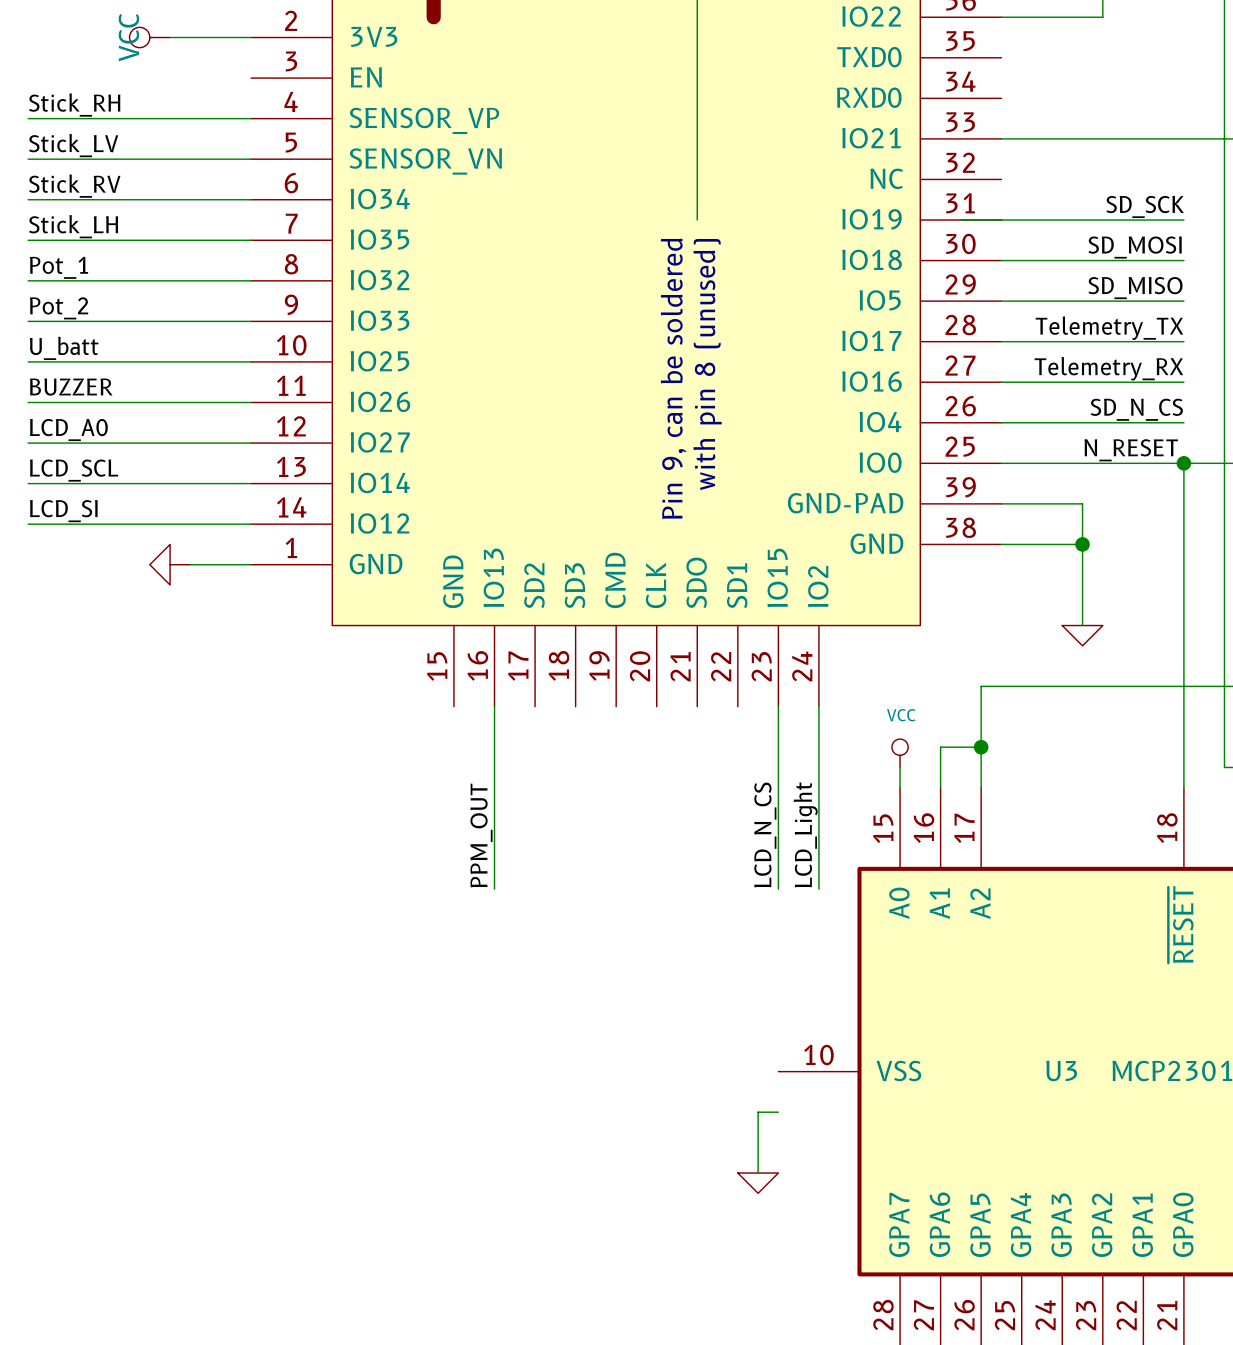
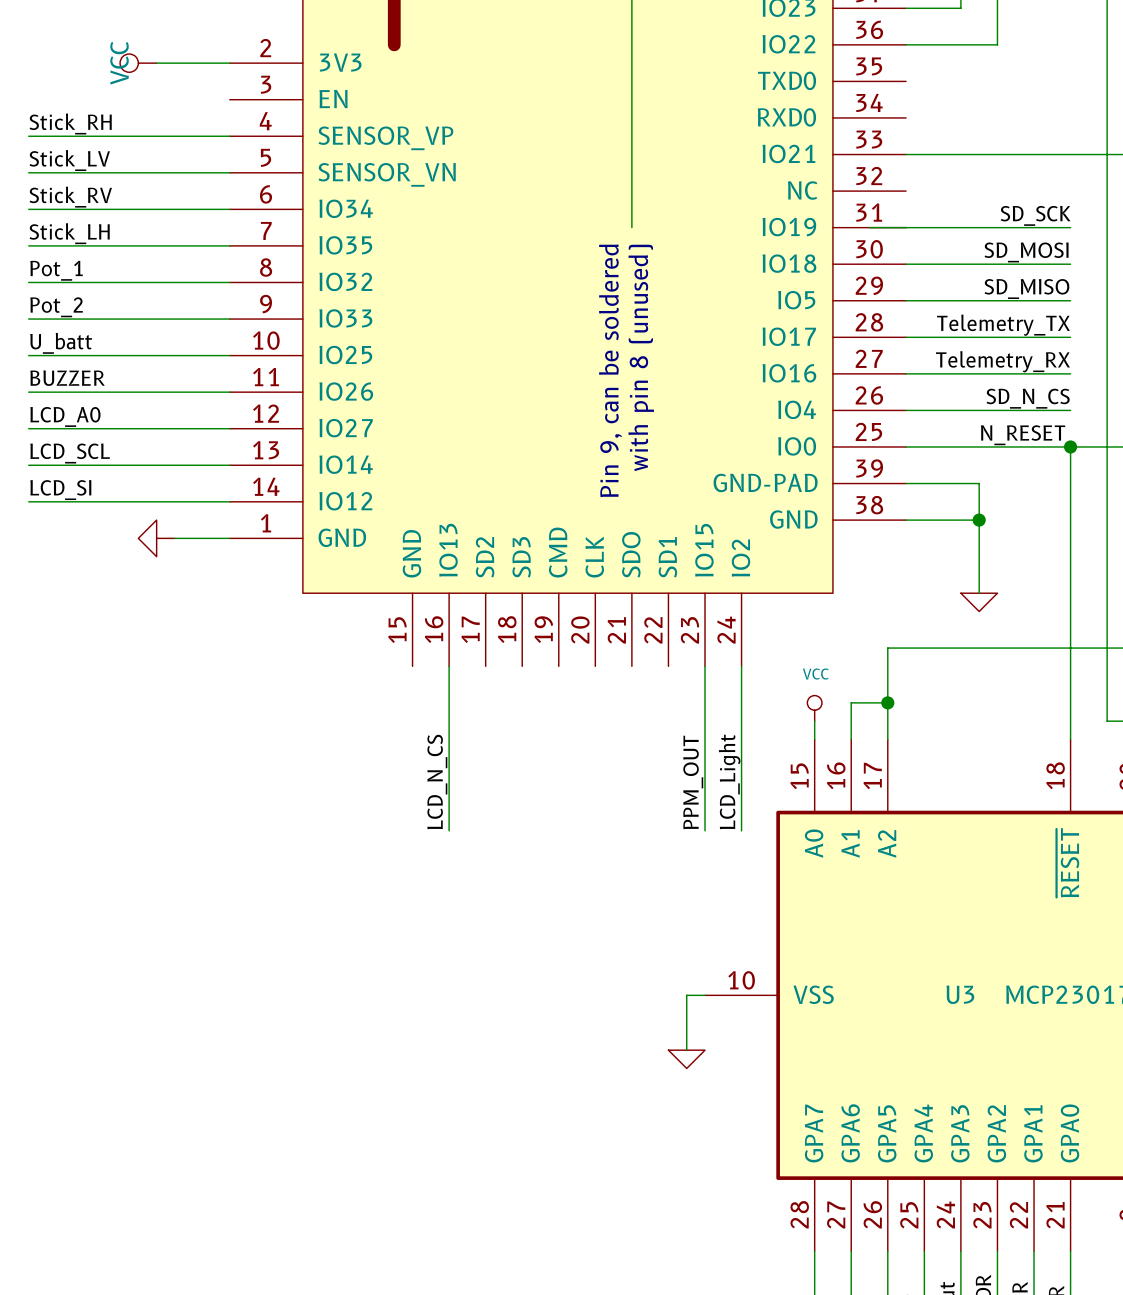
label: LCD_N_CS (765, 834) -> PPM_OUT (693, 782)
label: PPM_OUT (481, 835) -> LCD_N_CS (437, 782)
wire: (758, 1112) (778, 1112) -> (686, 1031) (686, 995) (705, 995)
wire: (758, 1132) (758, 1173) -> none
power symbol position: (758, 1183) -> (686, 1059)

